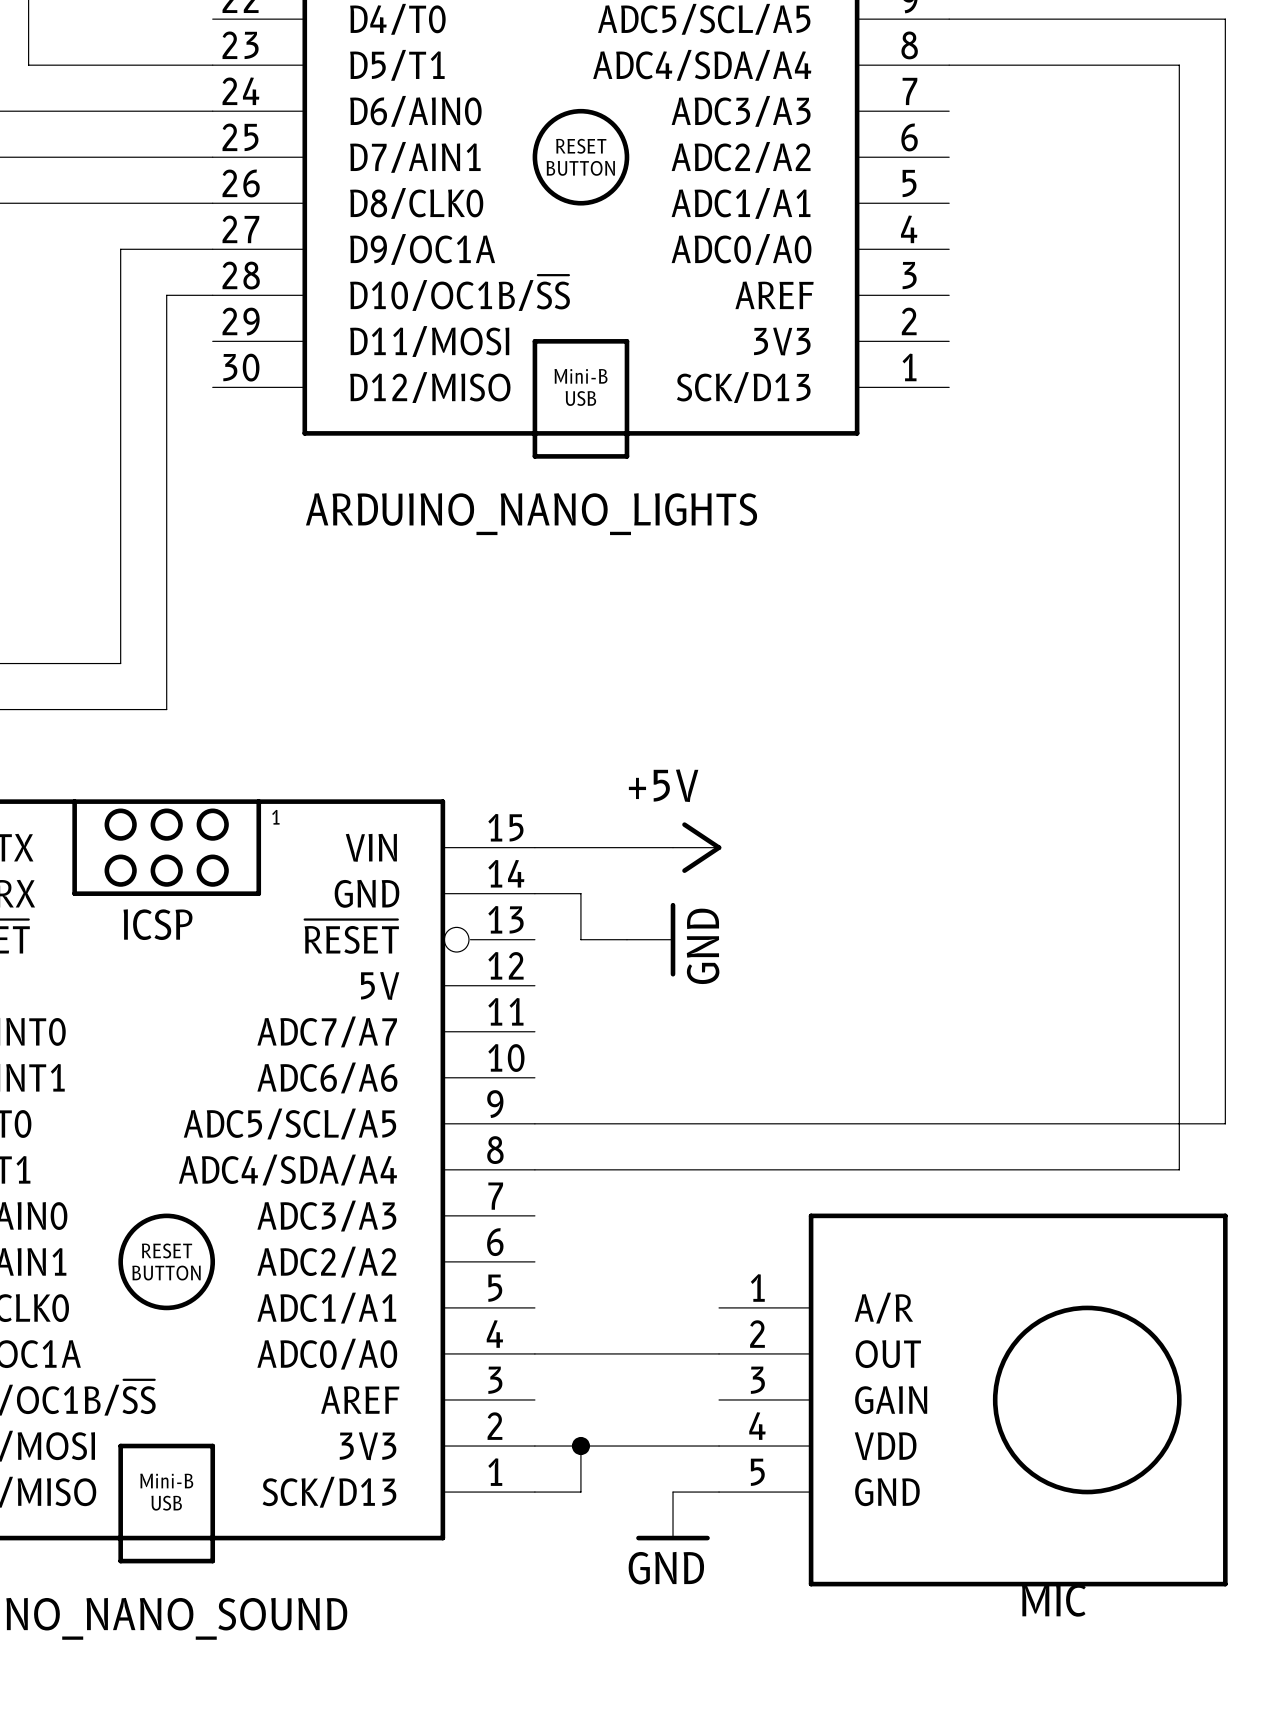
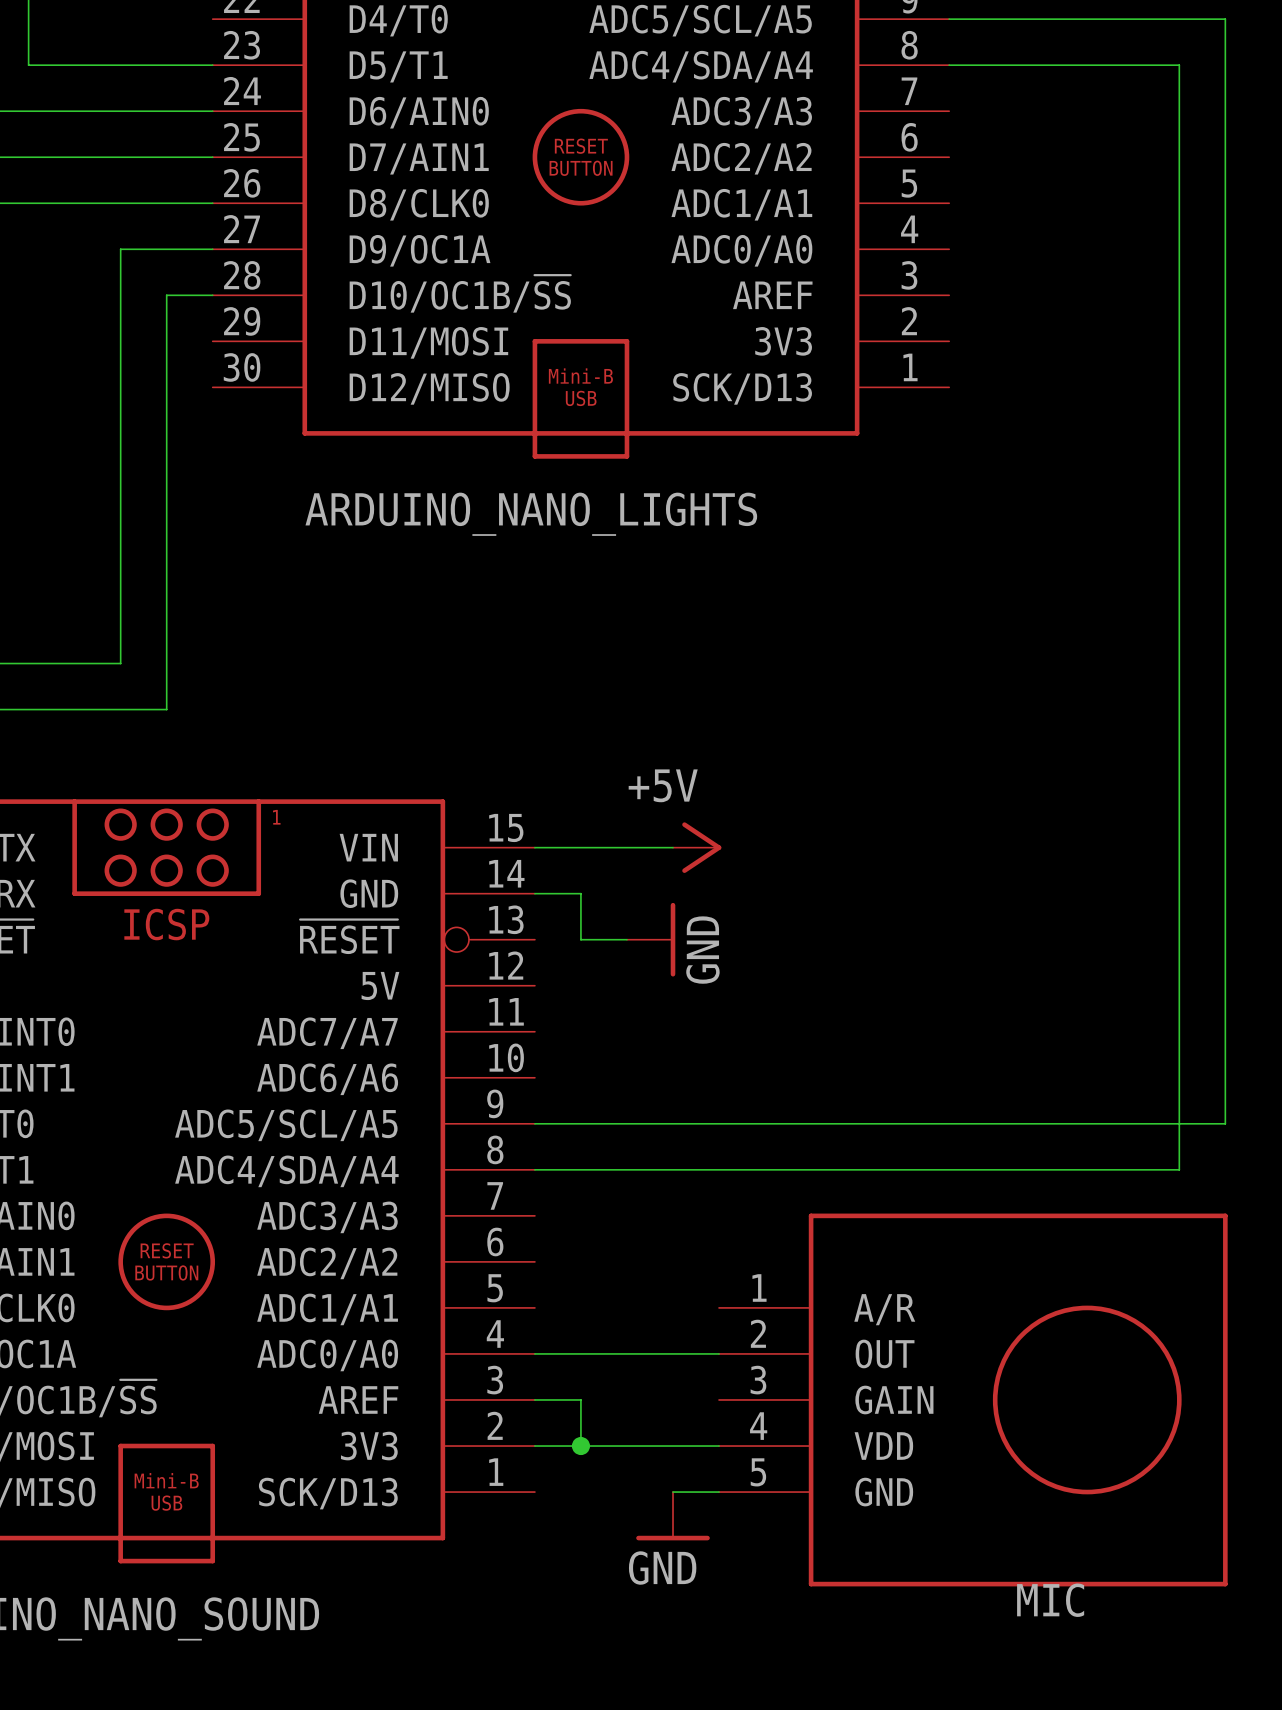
wire: (580, 1446) (580, 1492) (534, 1492) -> (580, 1446) (580, 1399) (534, 1399)

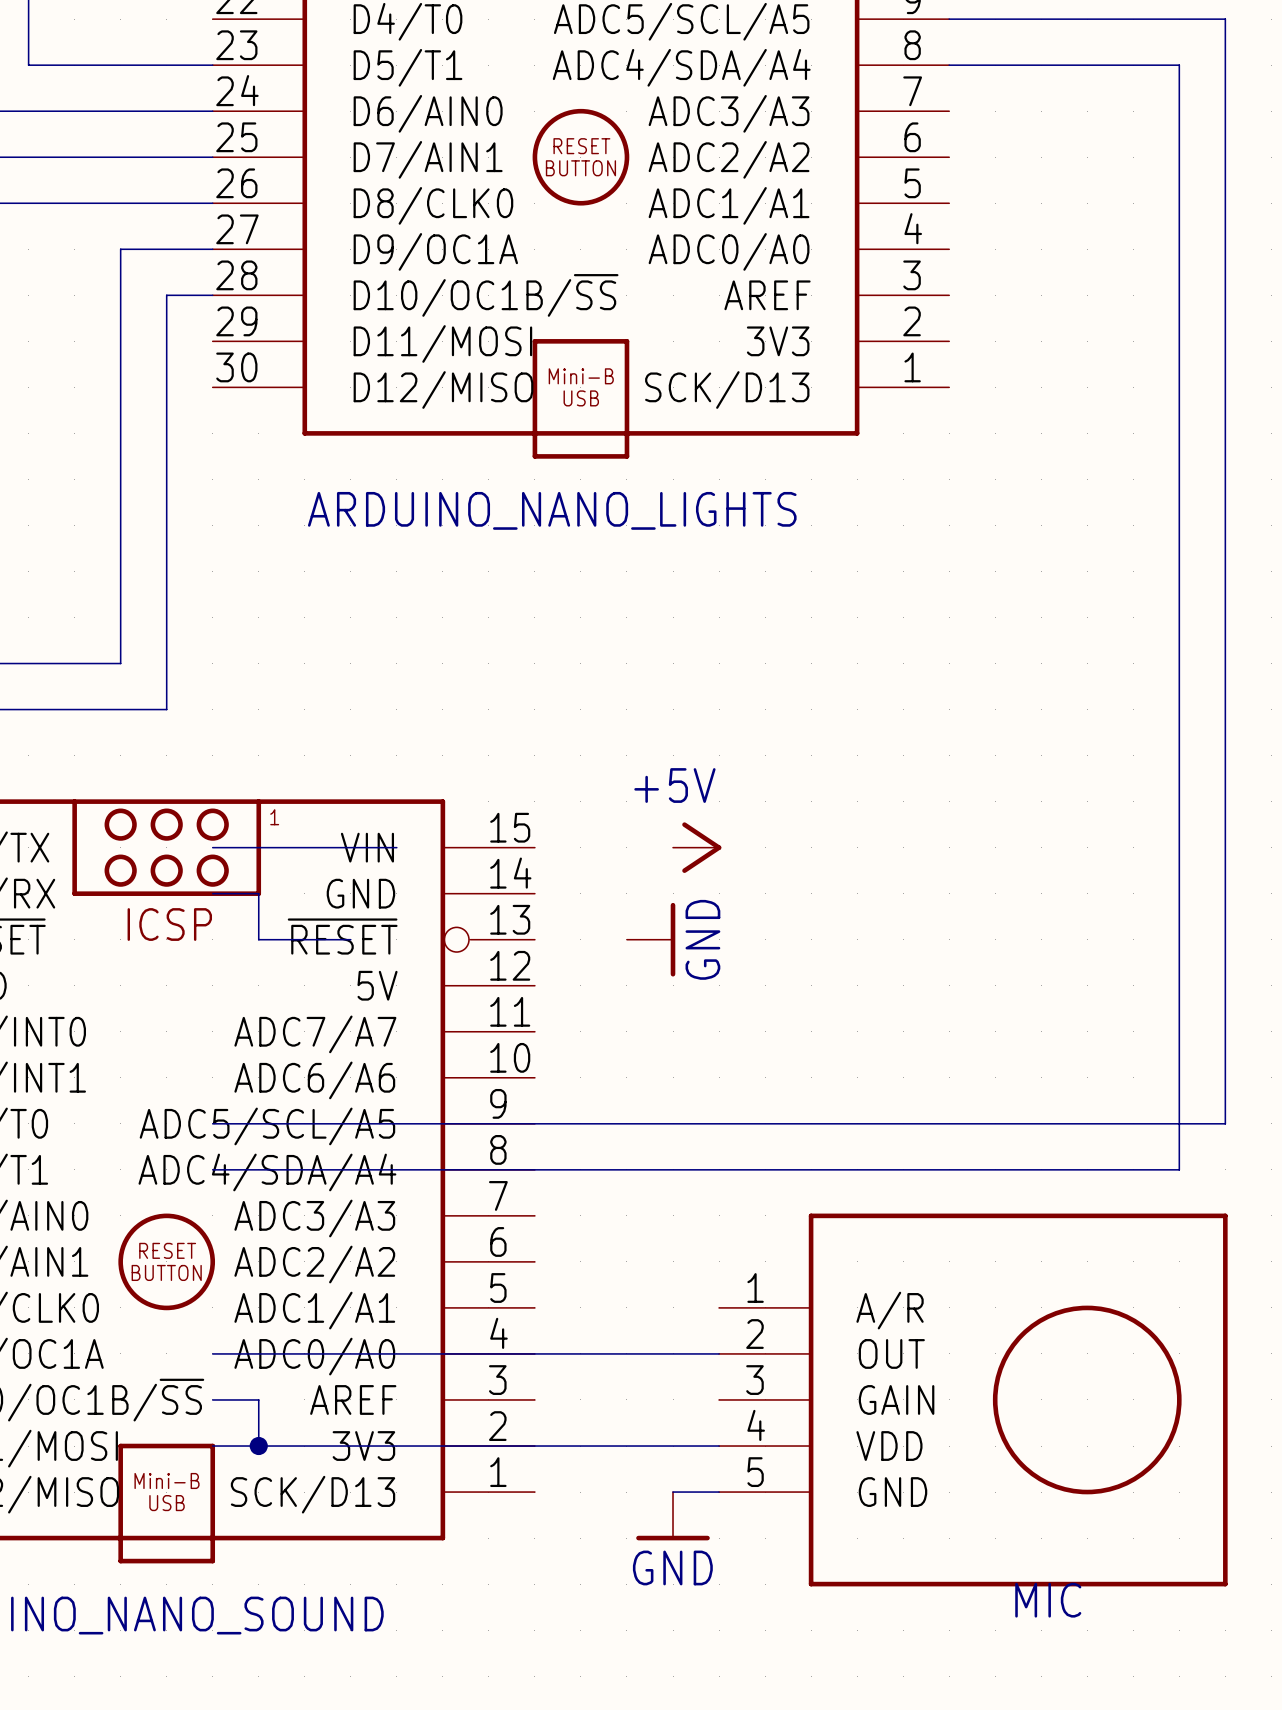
wire: none -> (212, 847) (396, 847)
wire: (534, 847) (673, 847) -> none
wire: none -> (212, 893) (258, 893) (258, 939) (350, 939)
wire: (534, 893) (580, 893) (580, 939) (626, 939) -> none
wire: none -> (212, 1123) (534, 1123)
wire: none -> (212, 1169) (534, 1169)
wire: none -> (212, 1353) (534, 1353)
wire: (534, 1399) (580, 1399) (580, 1446) -> (212, 1399) (258, 1399) (258, 1446)
wire: none -> (212, 1446) (534, 1446)
junction: none -> (258, 1446)
junction: (580, 1446) -> none

